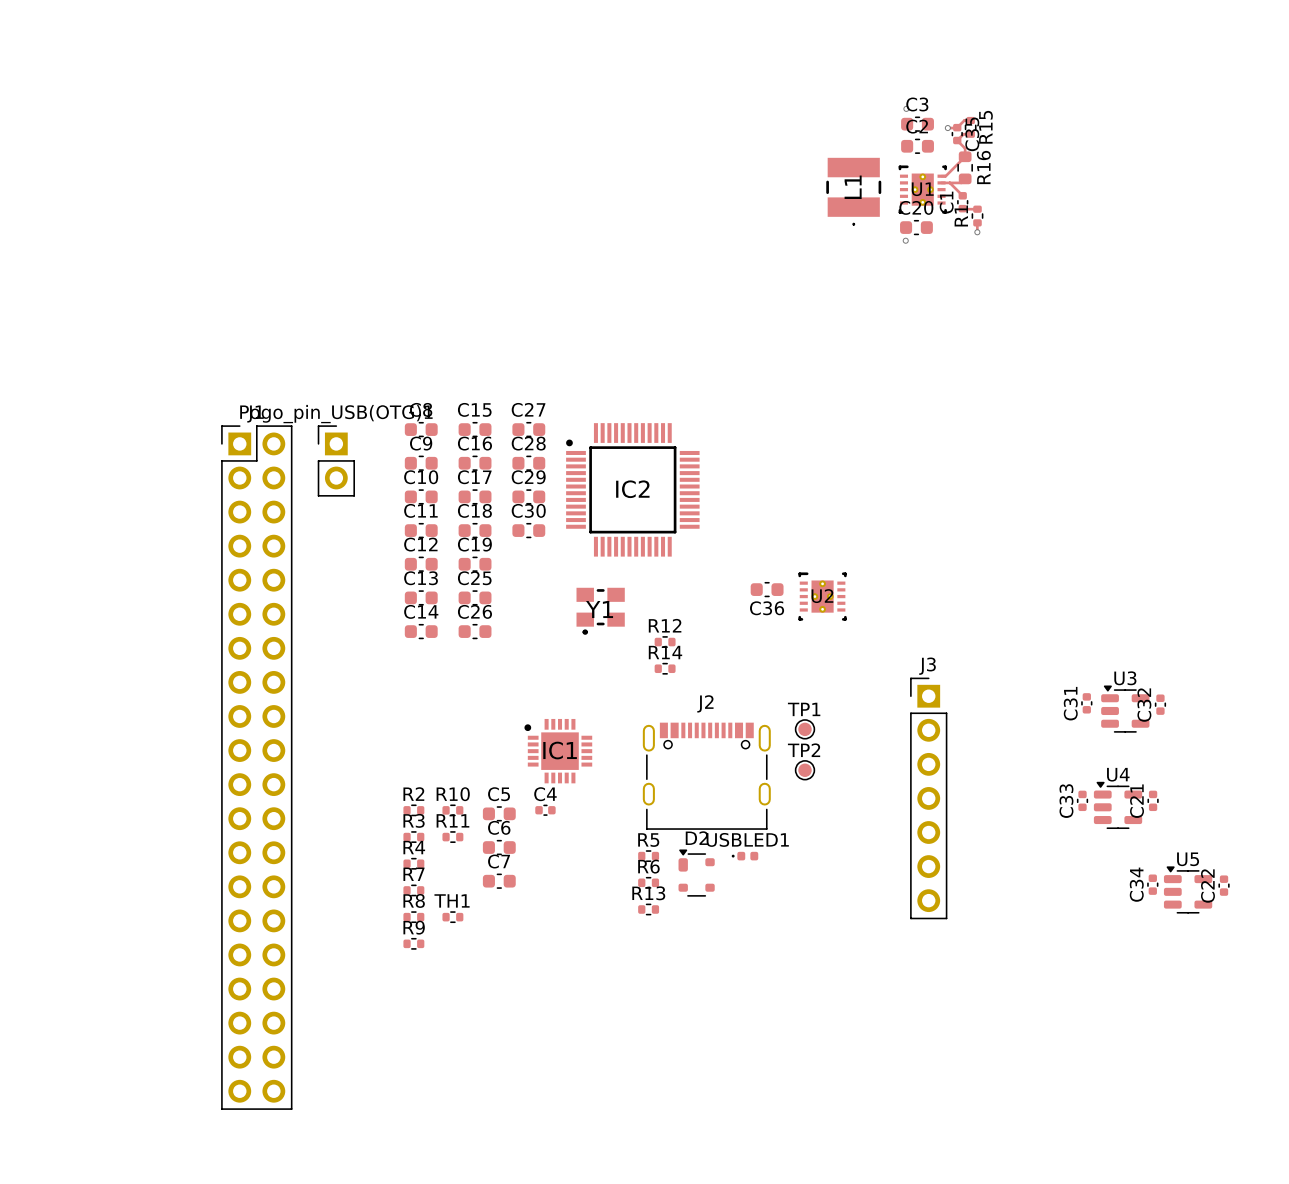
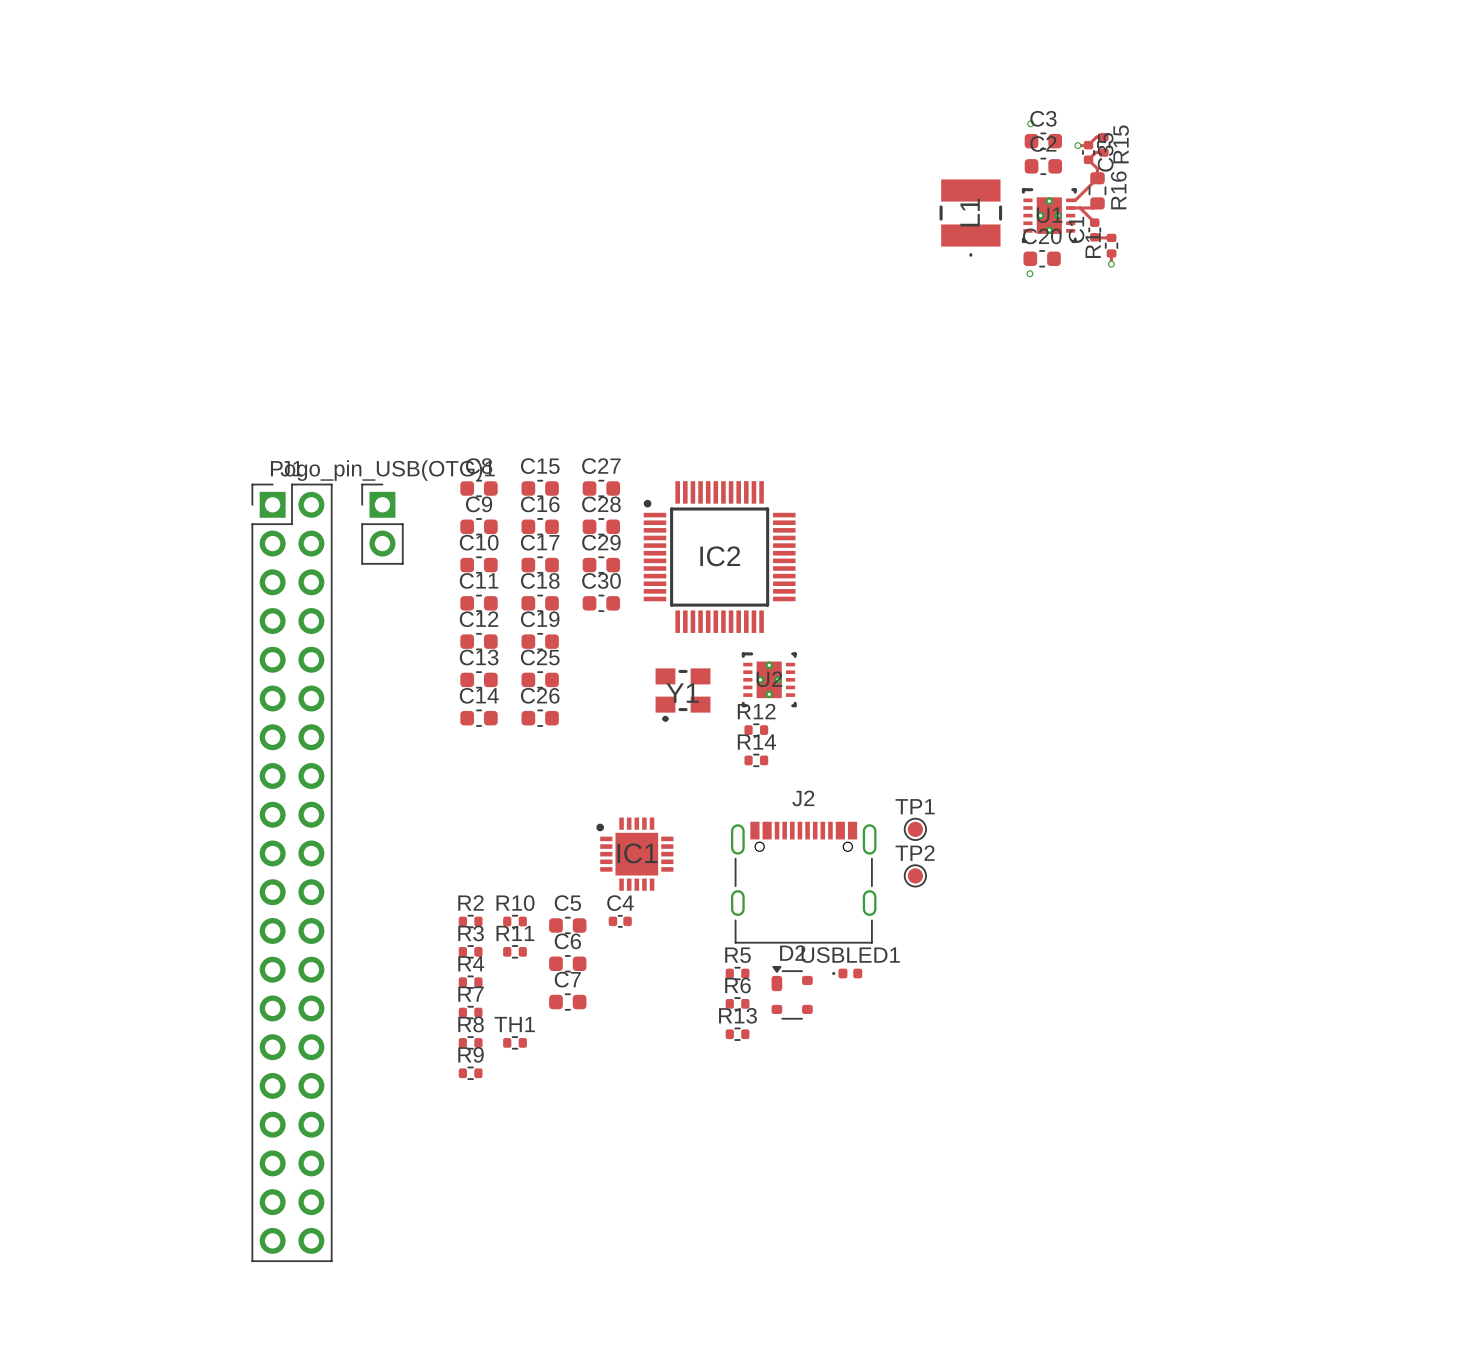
C36: (767, 589) -> none
U2 position: (822, 596) -> (769, 679)
C31: (1086, 703) -> none
C32: (1160, 704) -> none
U3: (1125, 709) -> none
J3: (928, 798) -> none
C33: (1082, 800) -> none
C21: (1153, 800) -> none
U4: (1118, 805) -> none
C34: (1152, 884) -> none
C22: (1224, 885) -> none
U5: (1188, 889) -> none

